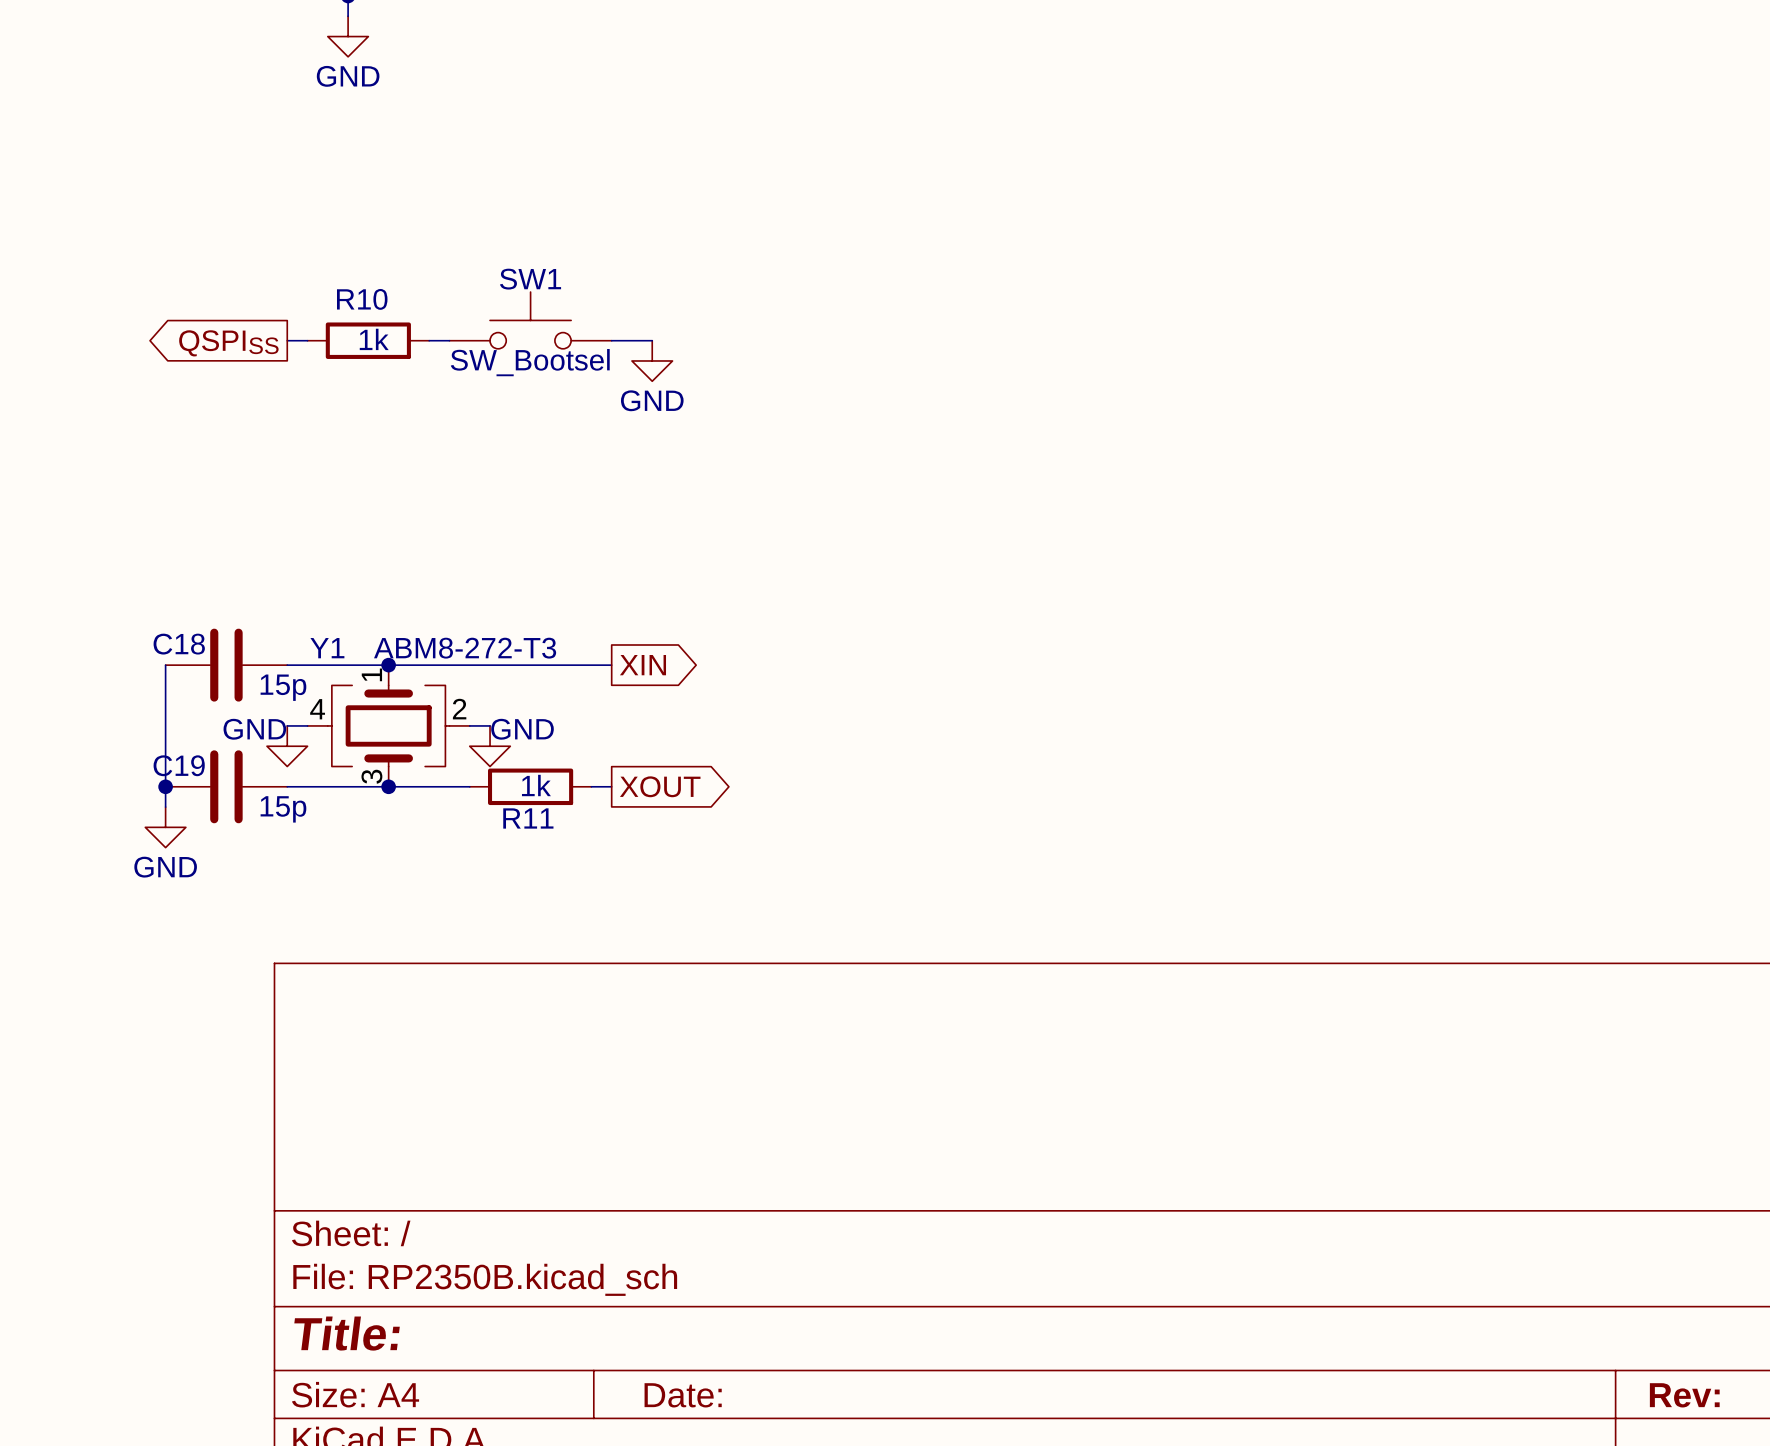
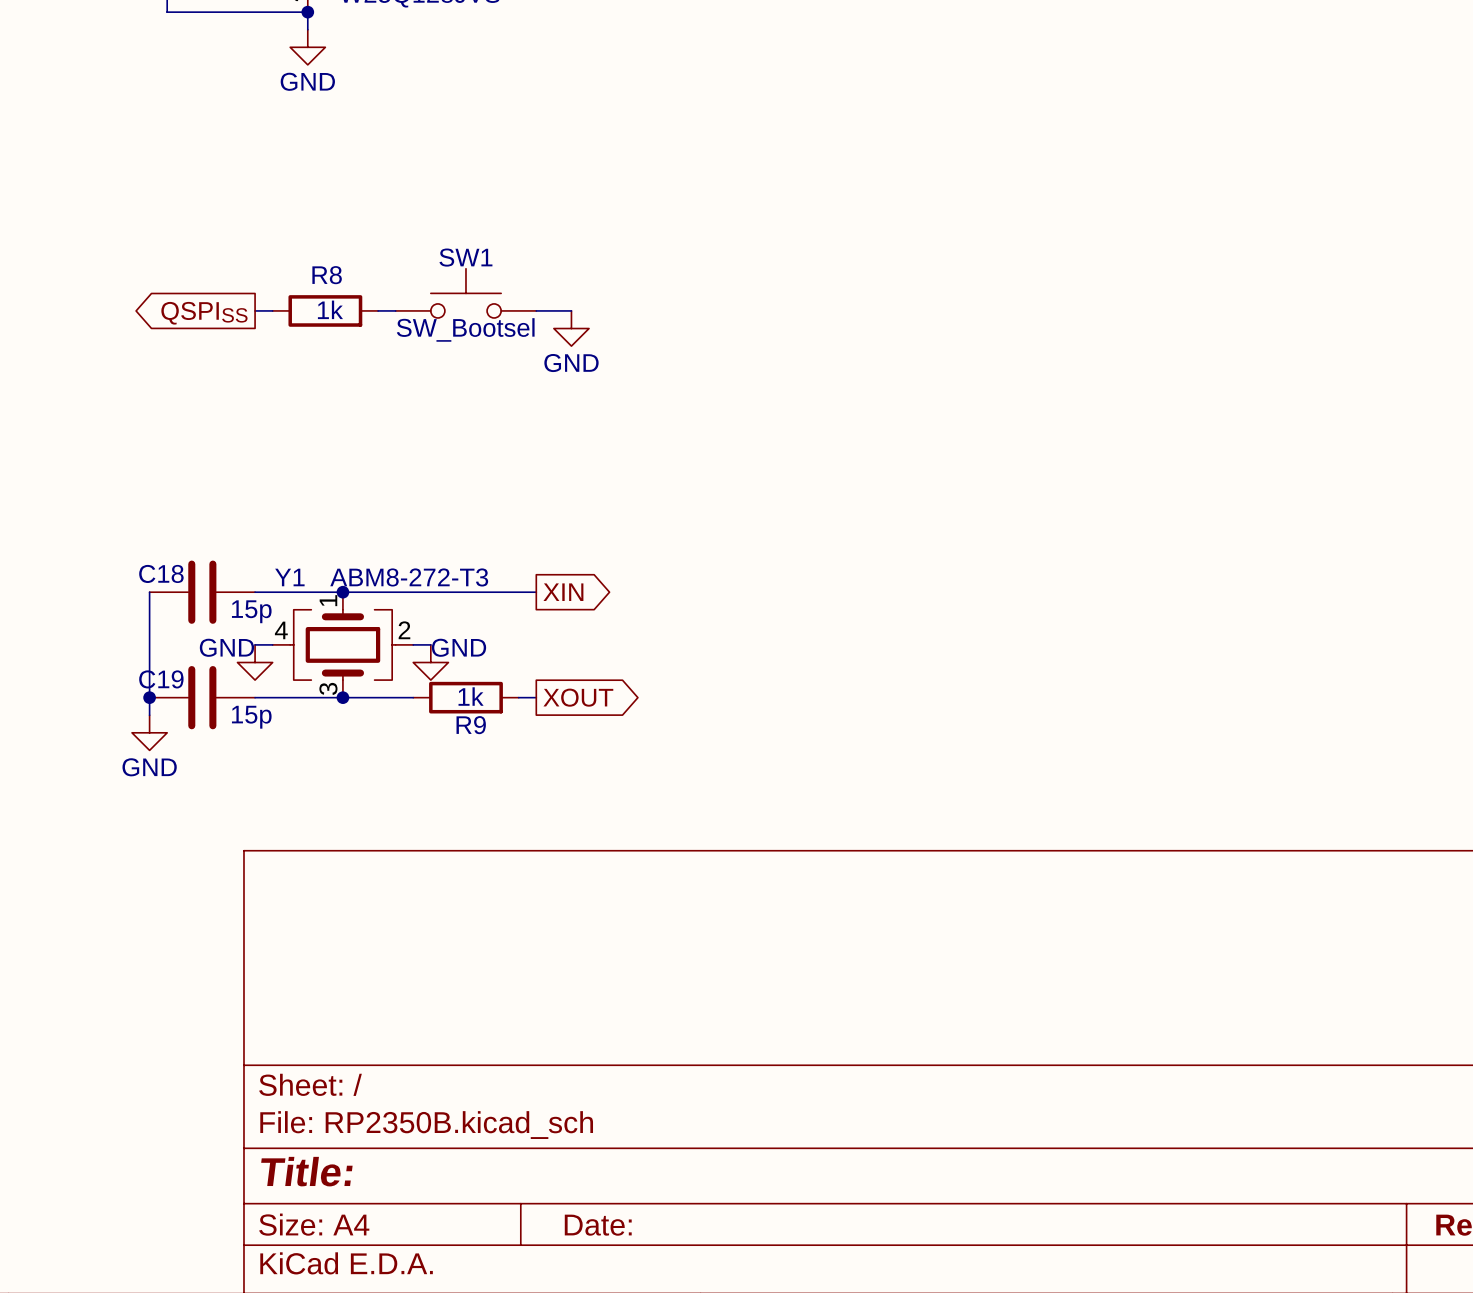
R10 name: R10 (362, 299) -> R8 (327, 275)
R11 name: R11 (528, 818) -> R9 (471, 725)

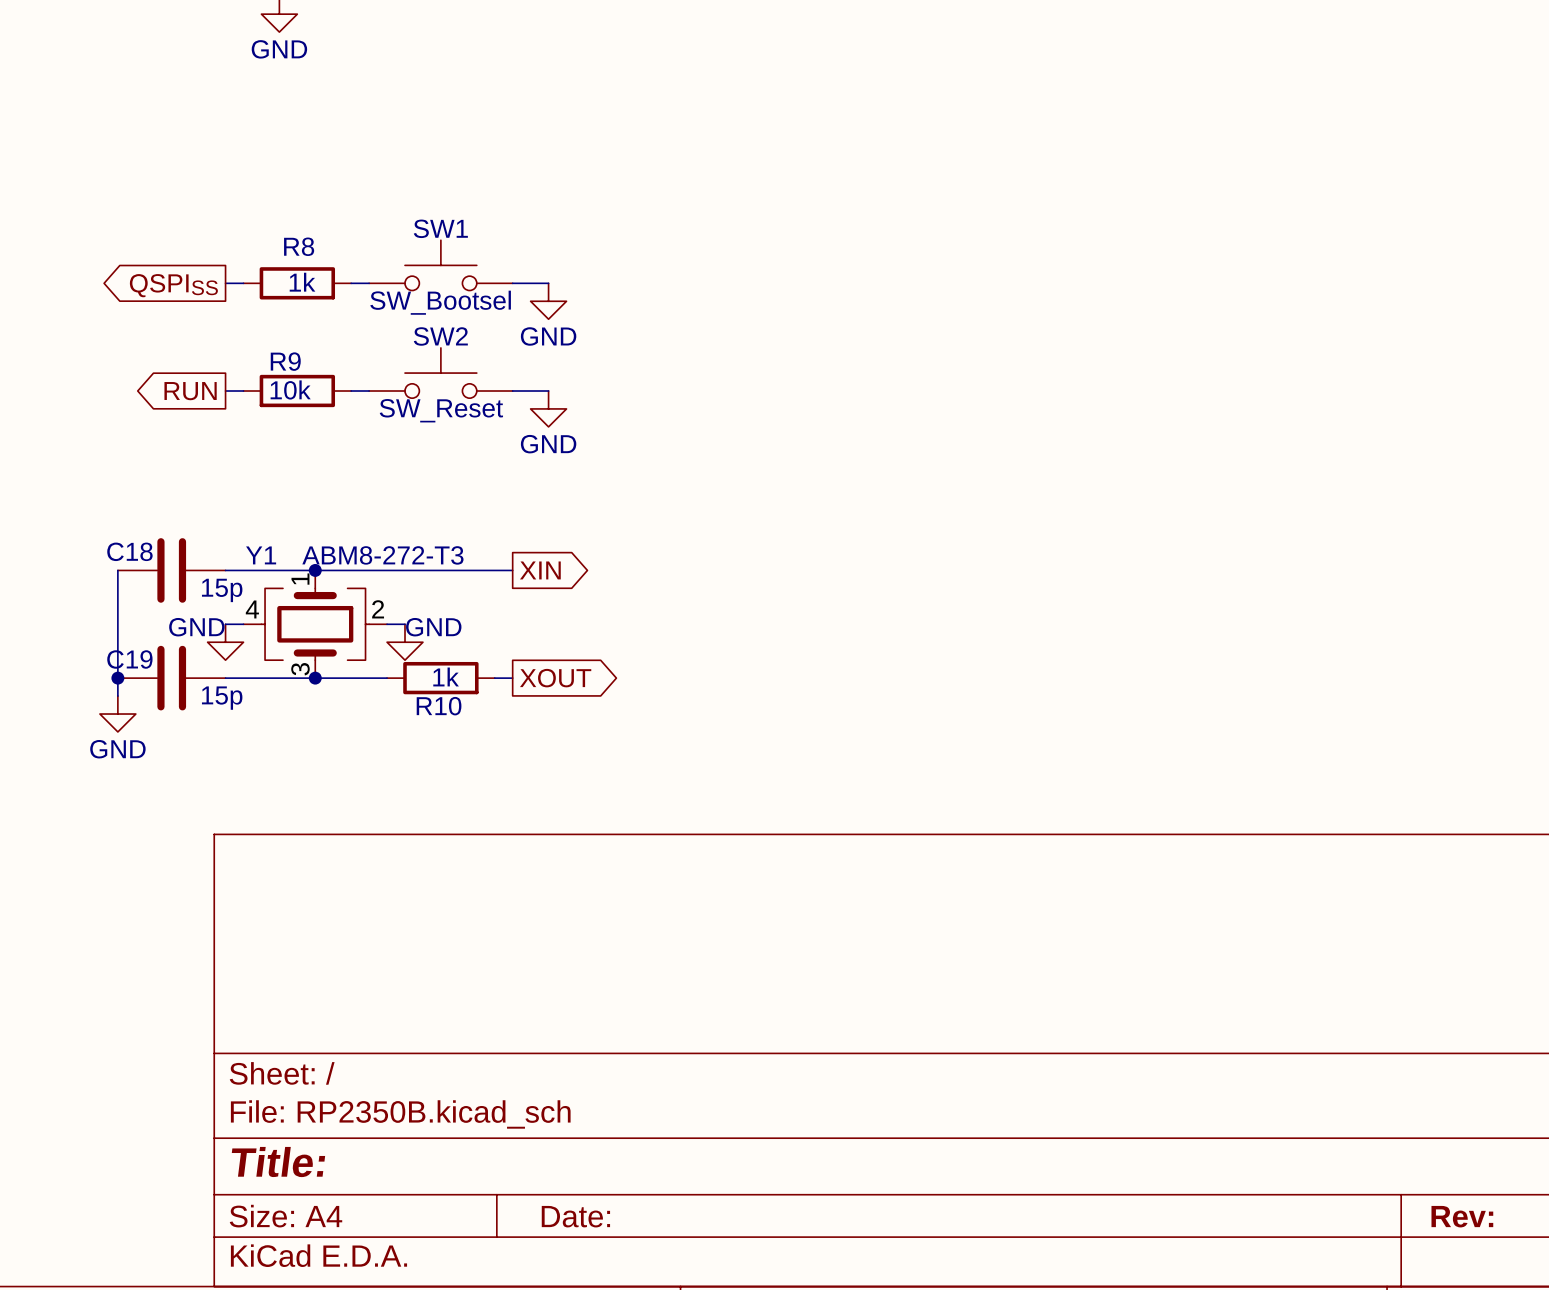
SW2: none -> SW_Reset (440, 373)
global label: none -> RUN (190, 391)
wire: none -> (225, 391) (243, 391)
R9: none -> 10k (297, 391)
wire: none -> (351, 391) (369, 391)
wire: none -> (512, 391) (548, 391)
power symbol: none -> GND (548, 408)
R9 name: R9 (471, 725) -> R10 (439, 706)

